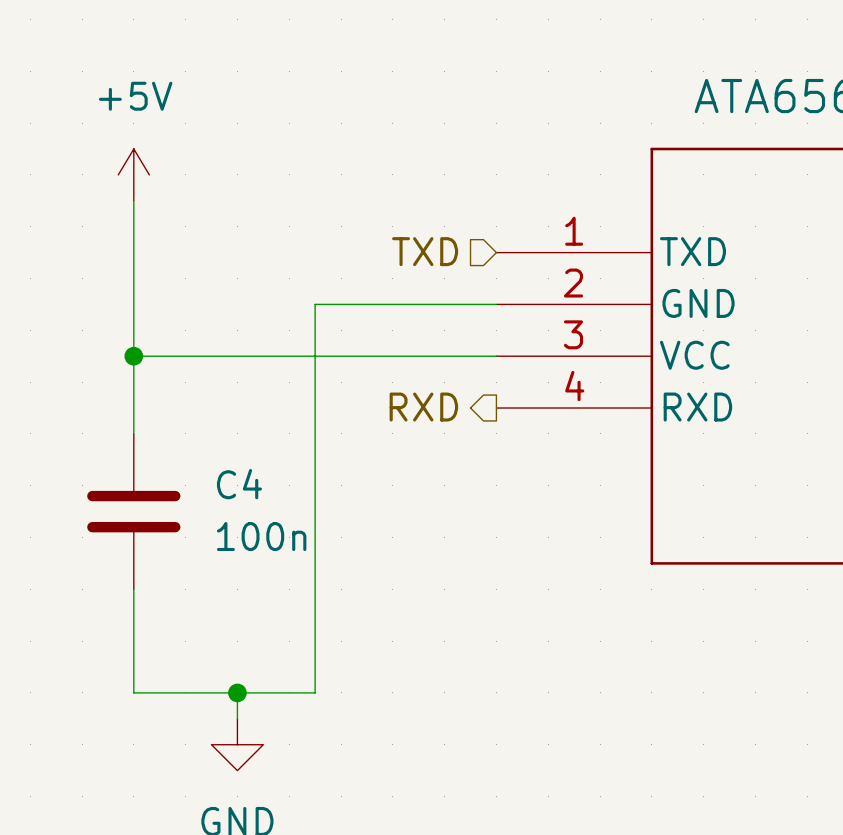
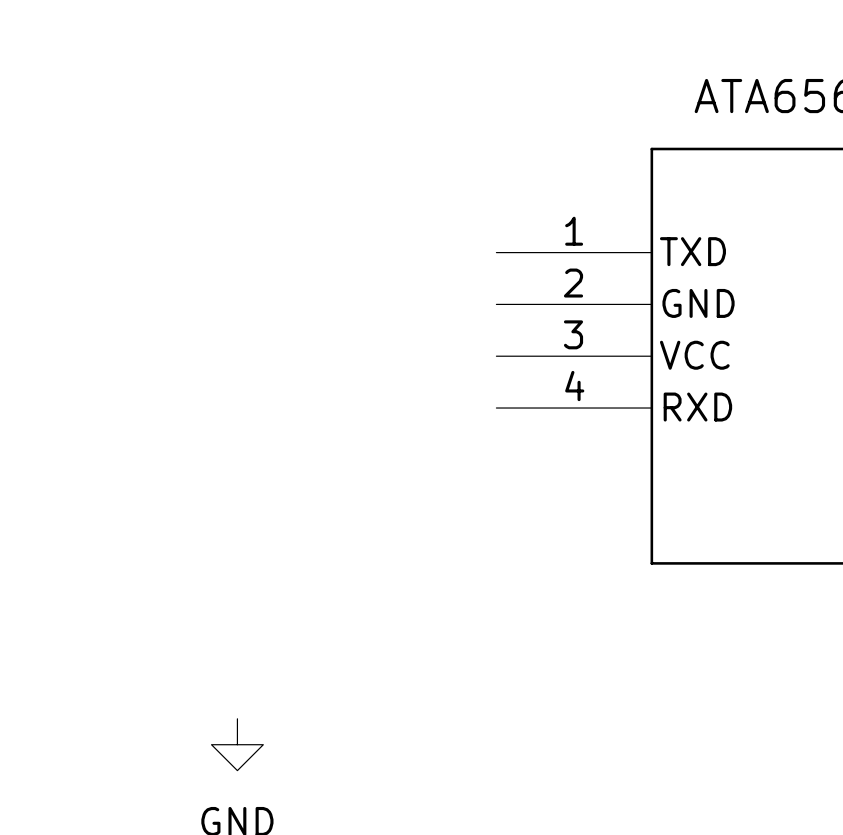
power symbol: +5V (133, 174) -> none
wire: (133, 200) (133, 433) -> none
hierarchical label: TXD (425, 251) -> none
wire: (496, 304) (315, 304) (315, 692) (133, 692) (133, 589) -> none
wire: (133, 356) (496, 356) -> none
junction: (133, 356) -> none
hierarchical label: RXD (423, 407) -> none
C4: 100n (133, 511) -> none
wire: (237, 692) (237, 718) -> none
junction: (237, 692) -> none

